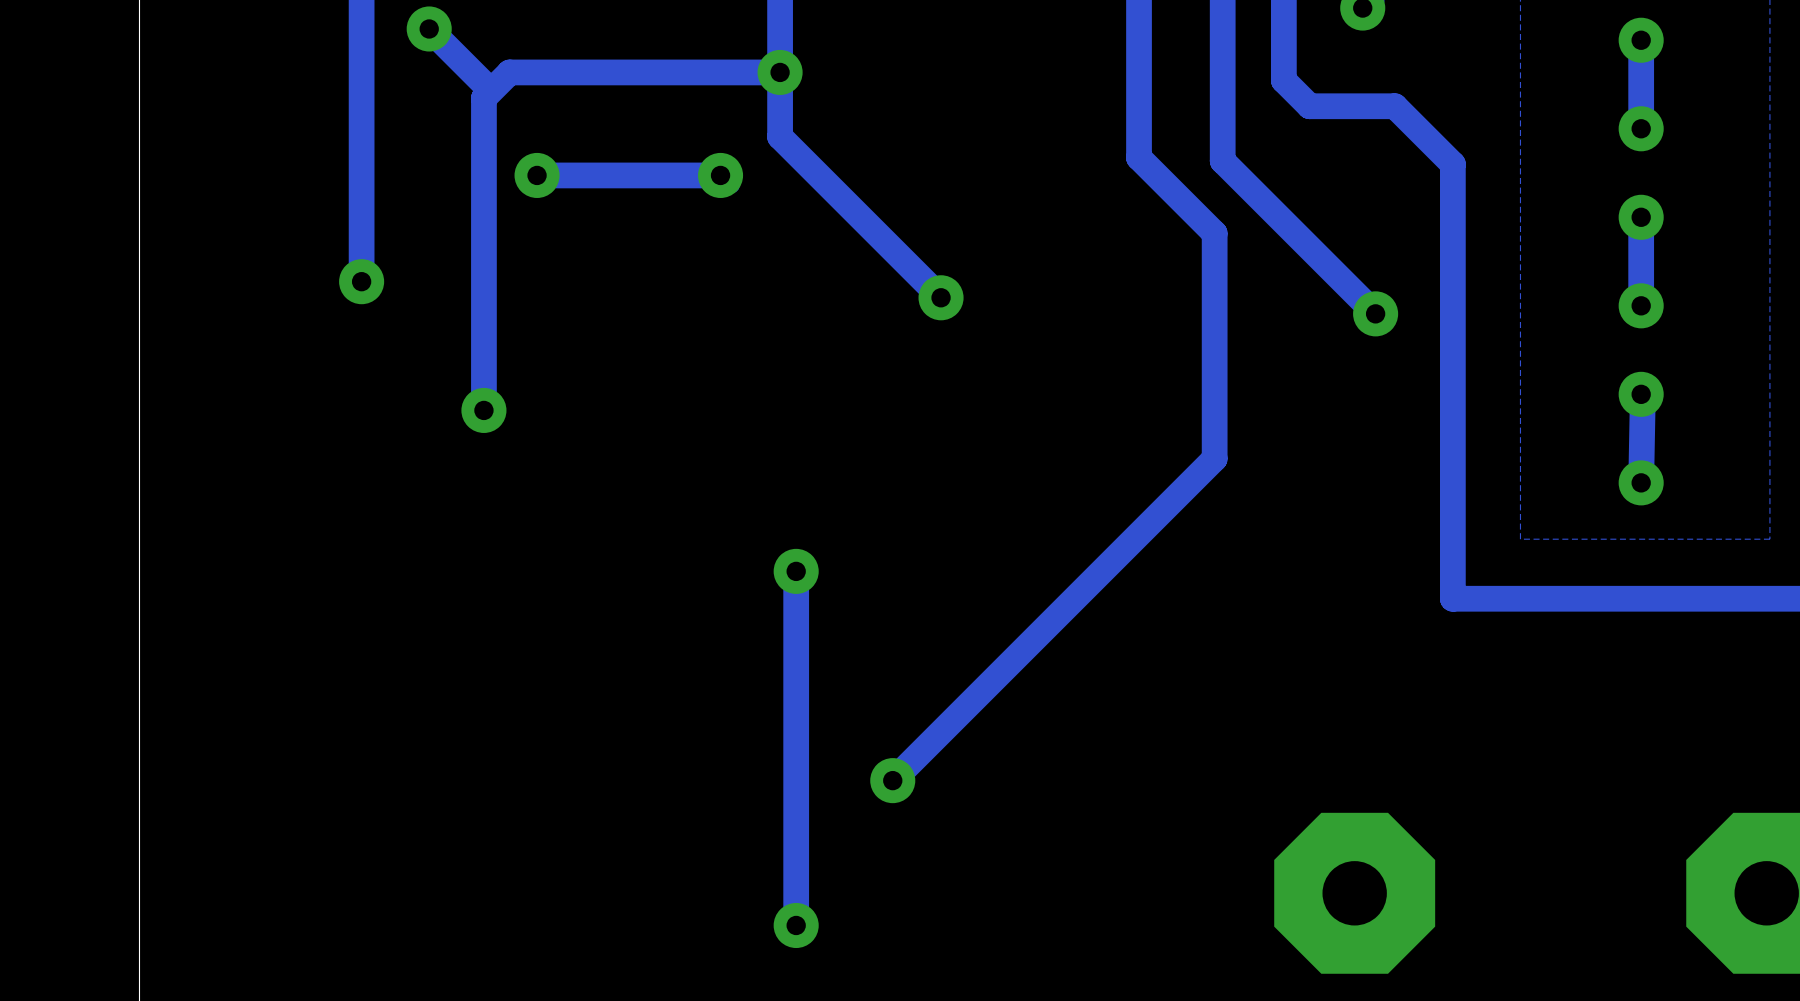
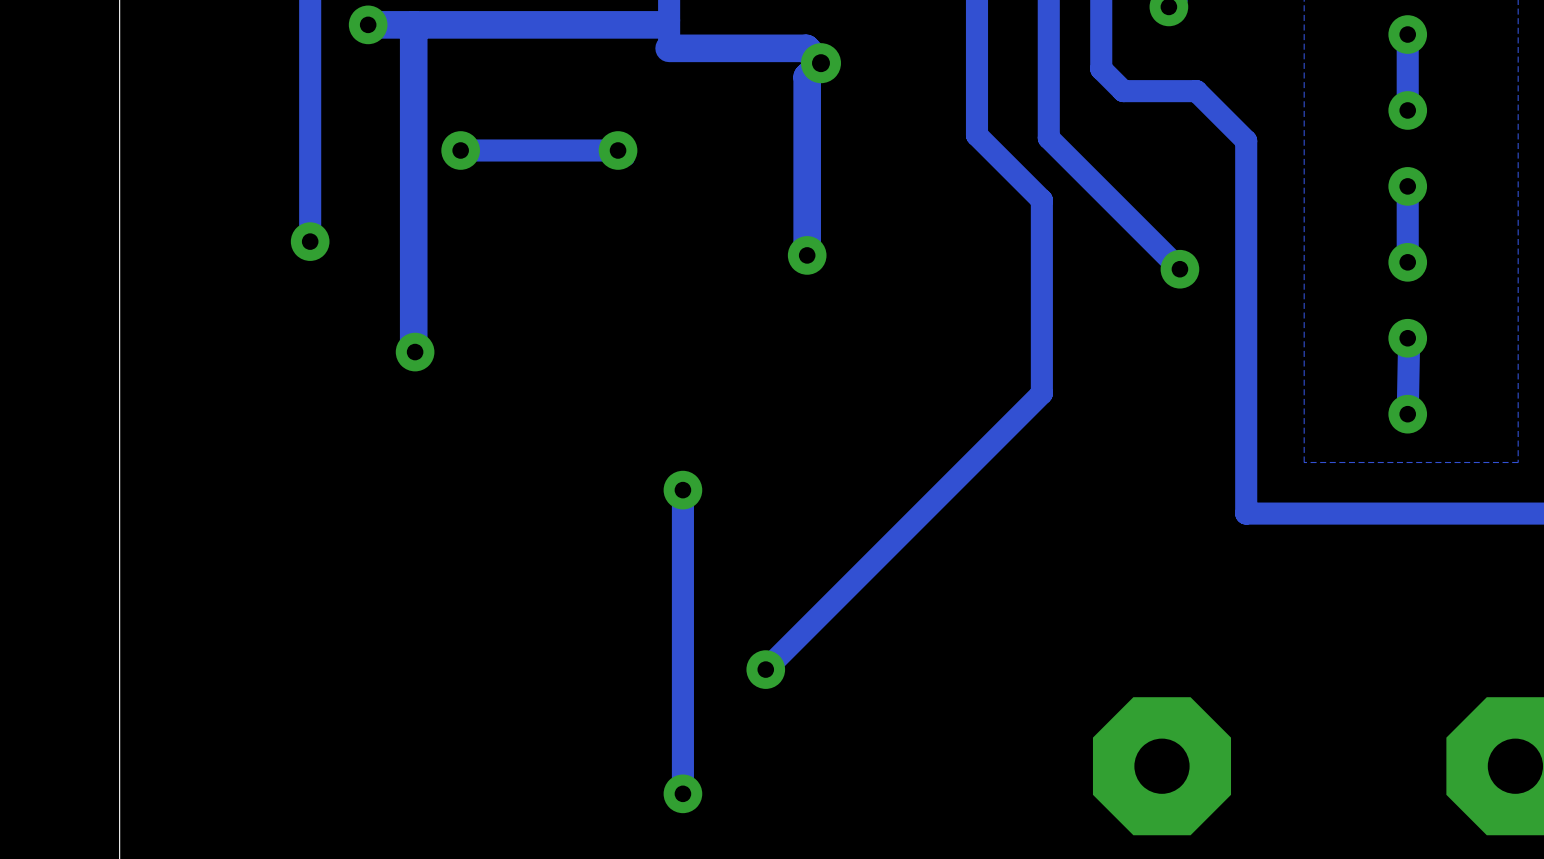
track: (429, 28) (483, 83) (483, 98) -> (368, 24) (664, 24) (669, 20)
track: (780, 56) (780, 136) (941, 297) -> (669, 48) (806, 48) (820, 63) (807, 76) (807, 255)
track: (780, 72) (509, 72) (483, 98) -> none
via: (780, 72) -> none
via: none -> (820, 63)
track: (483, 98) (483, 410) -> (413, 24) (413, 352)

